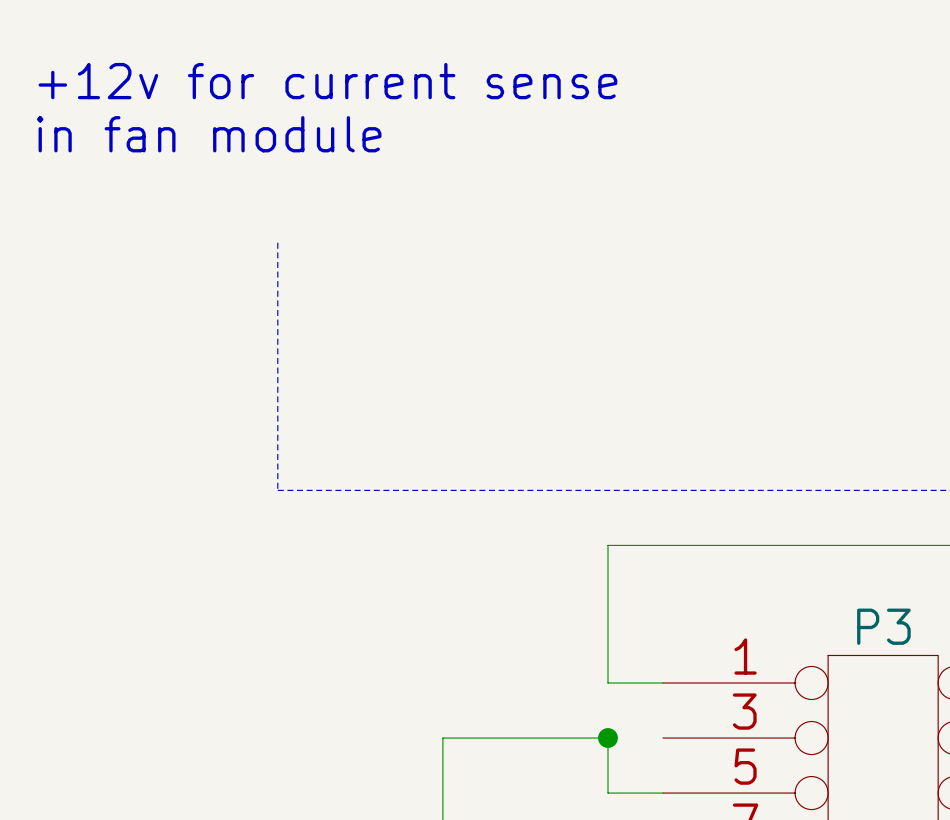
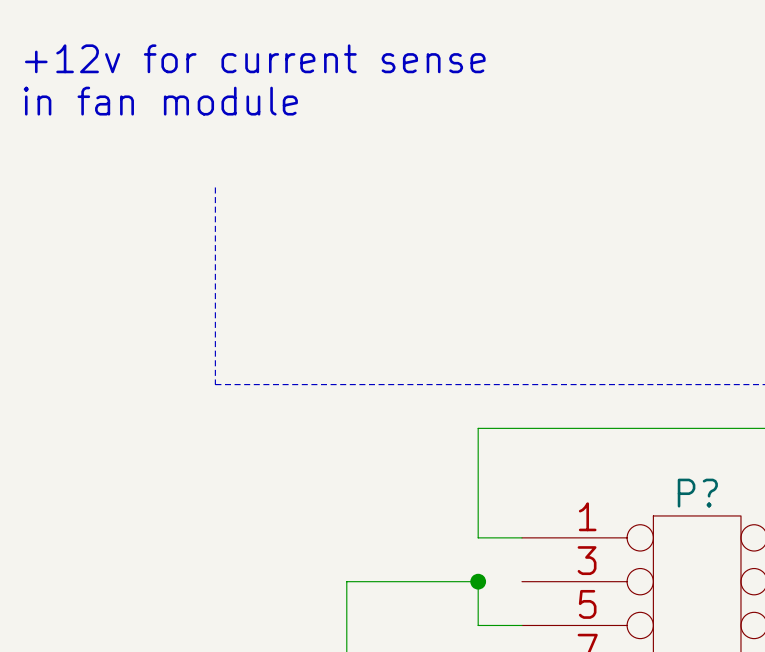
P3 name: P3 (883, 626) -> P? (697, 493)

